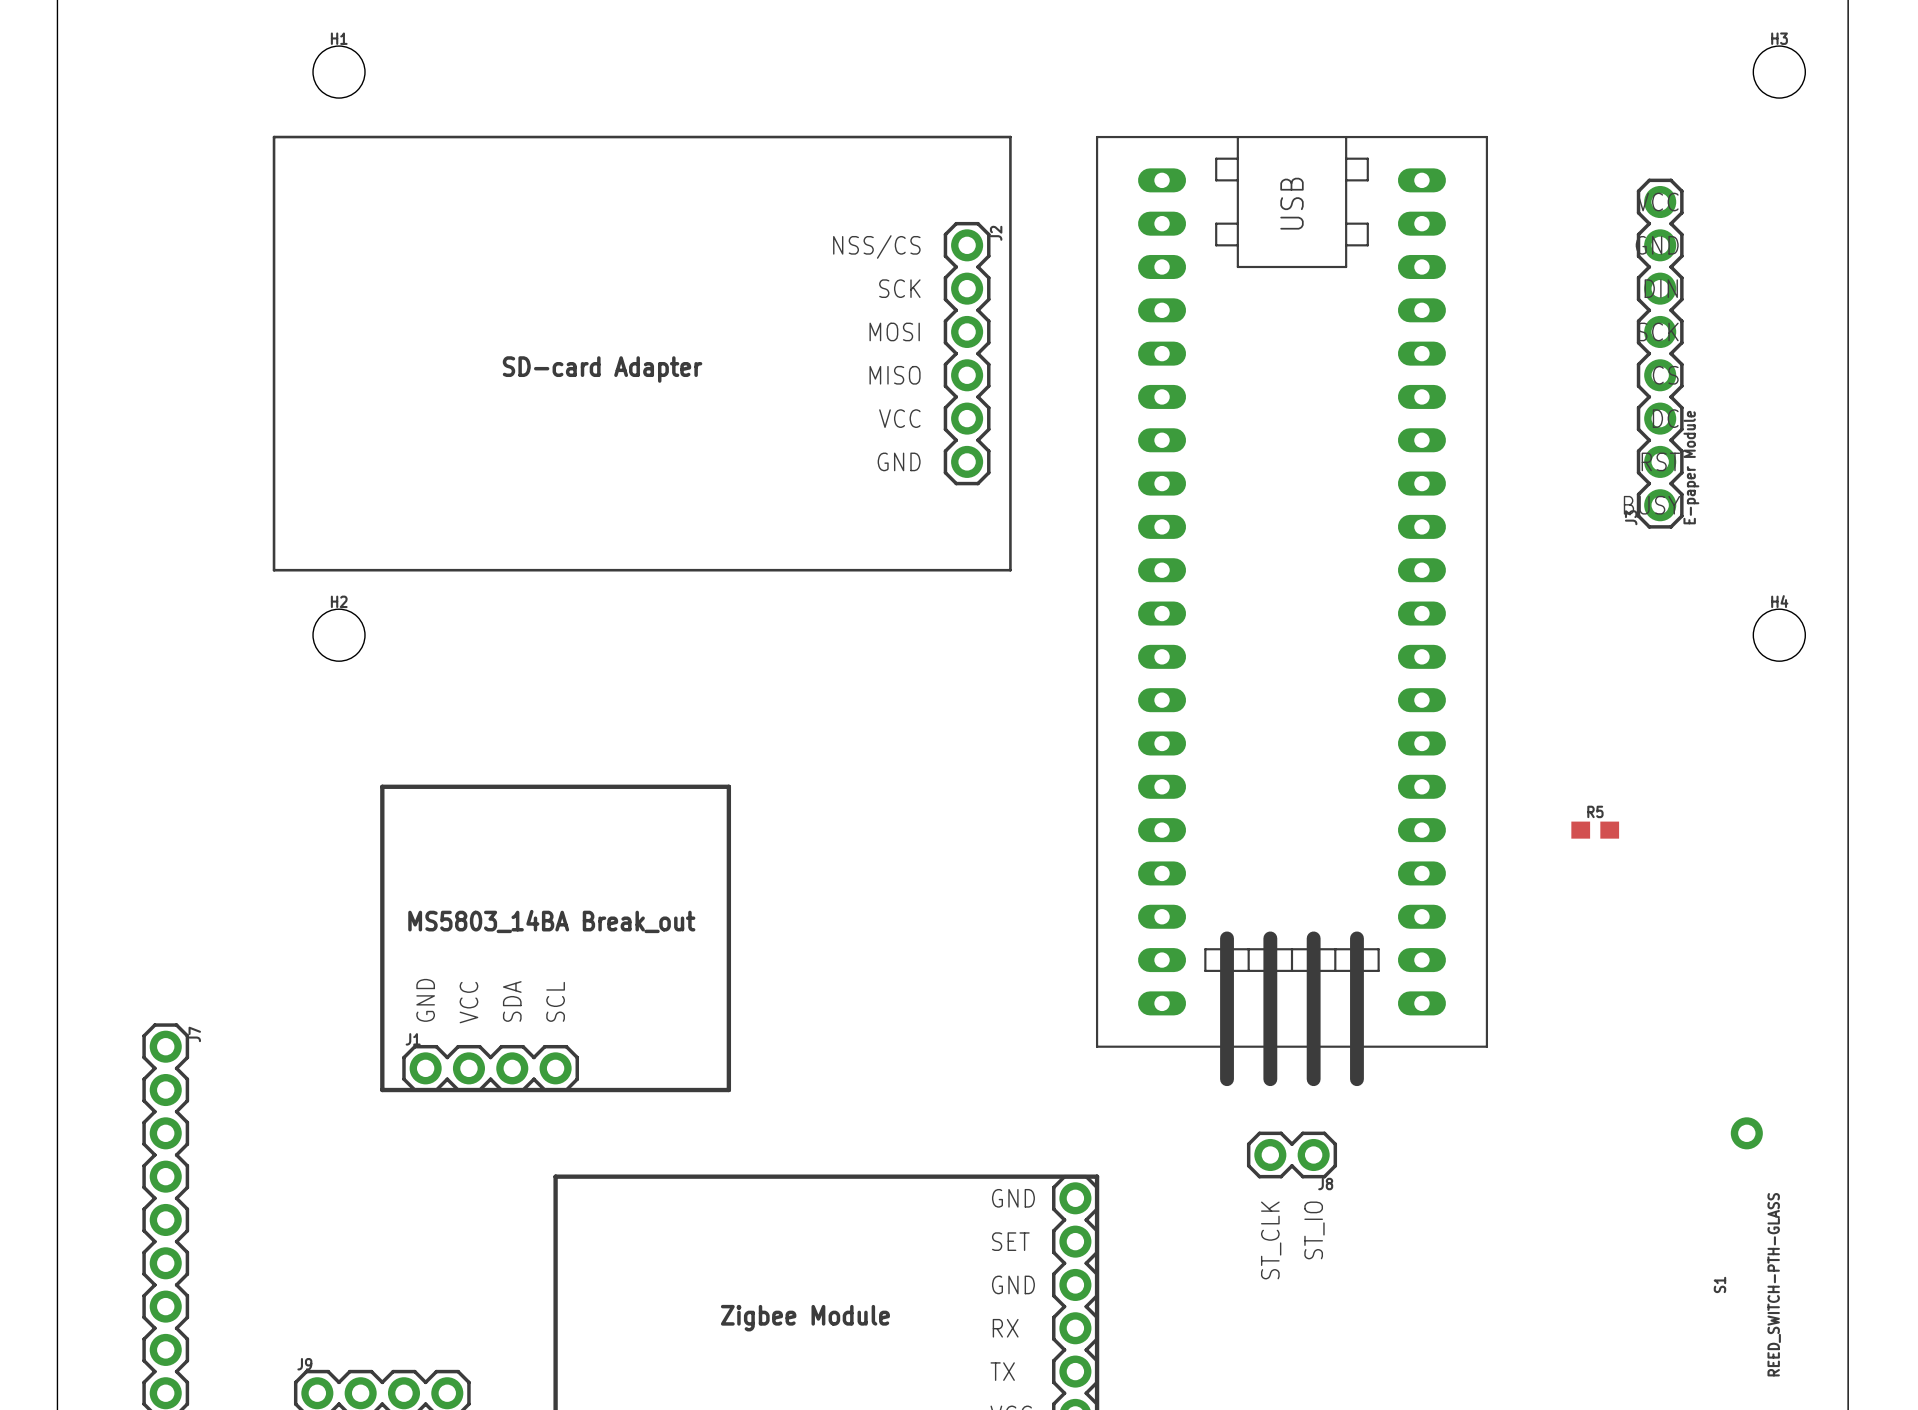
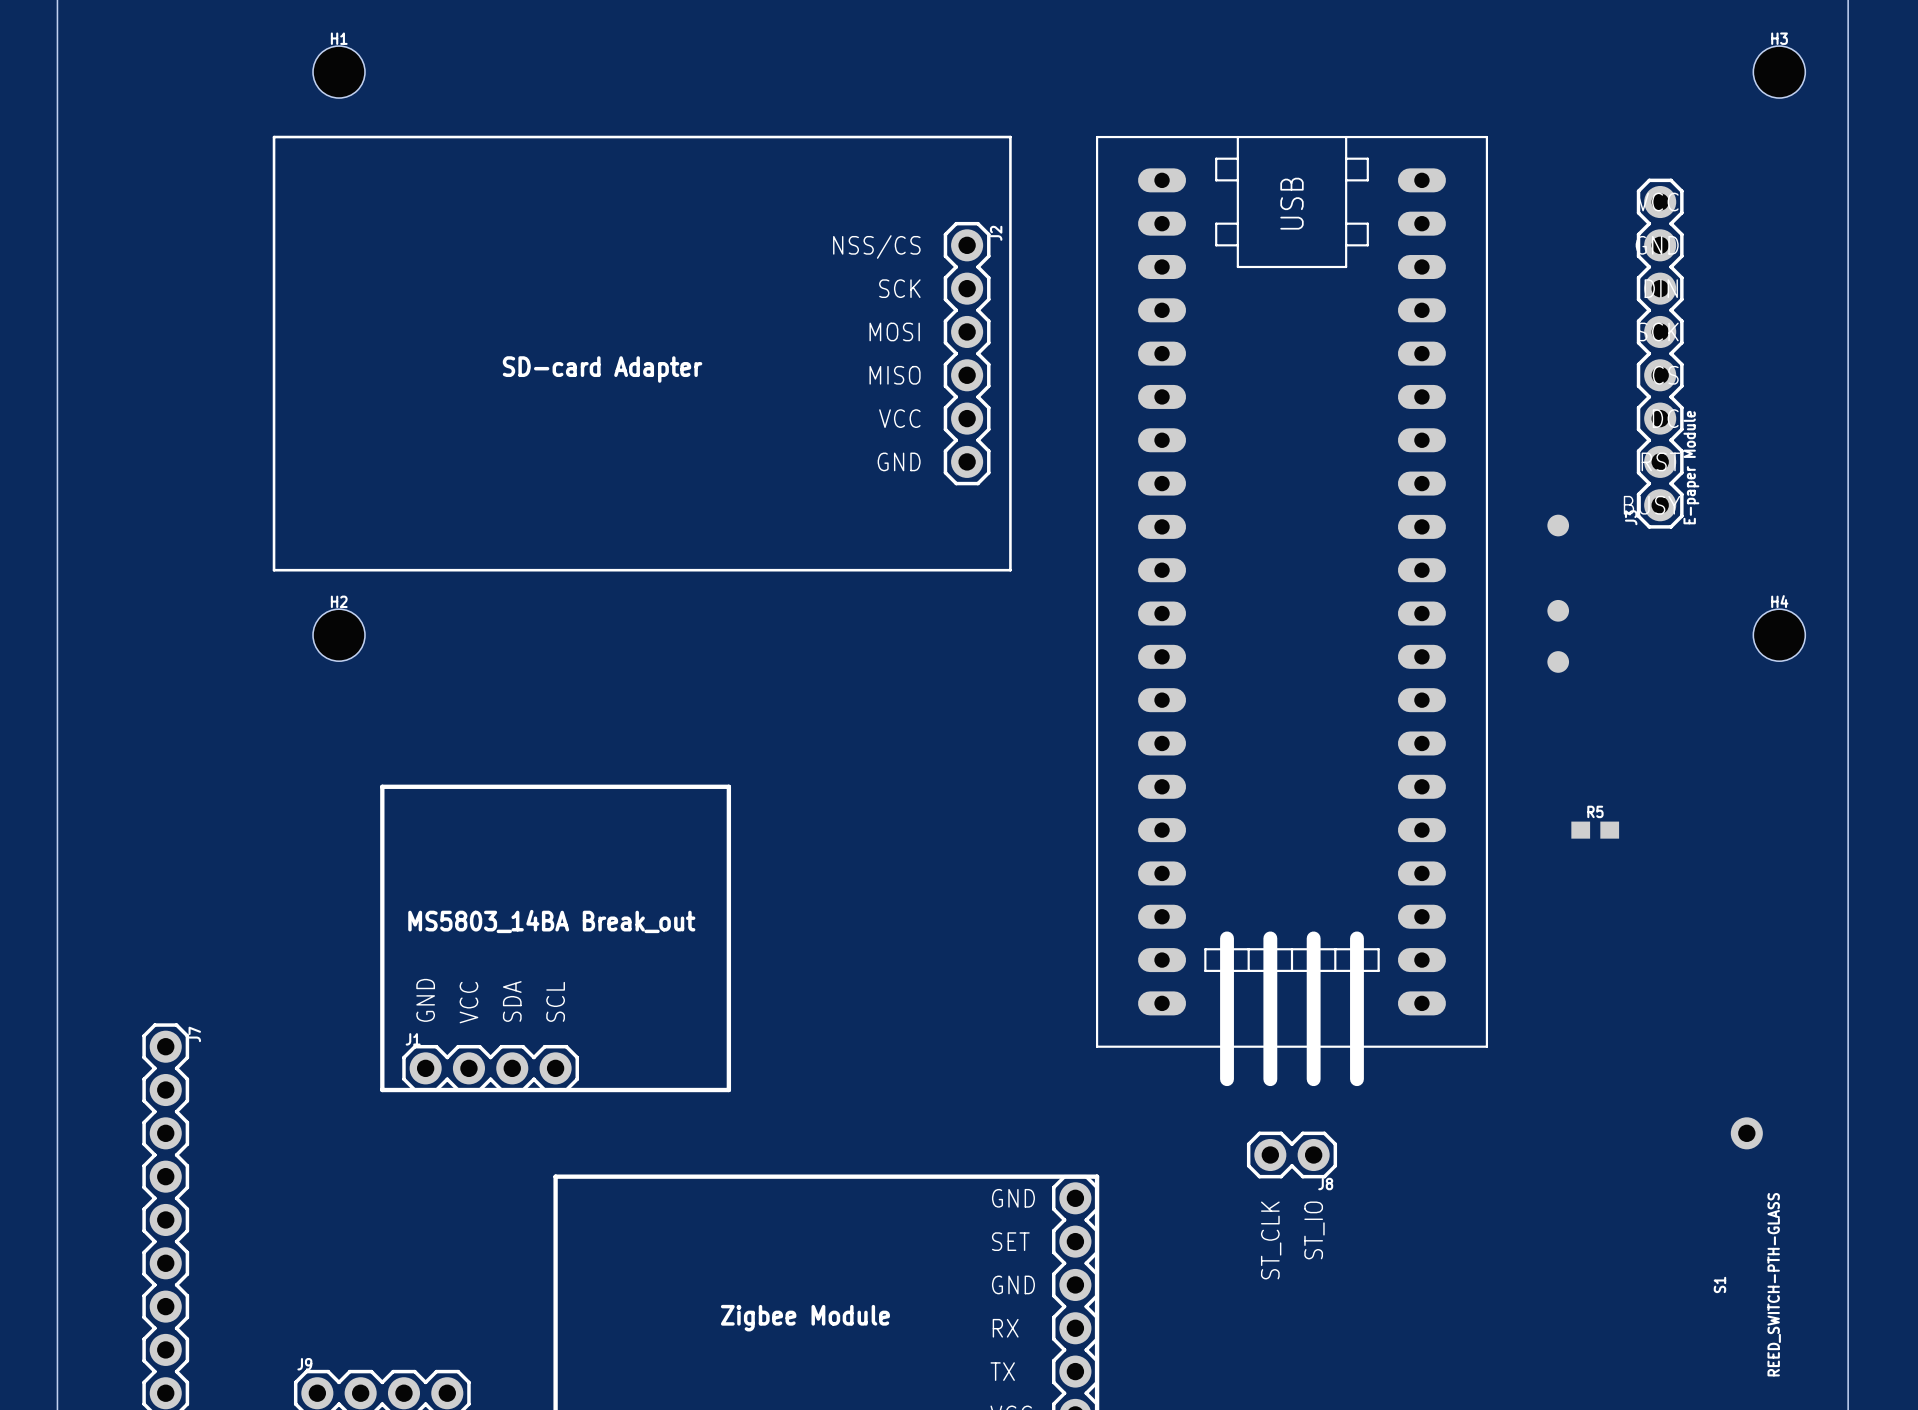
part: none -> (1558, 525)
part: none -> (1558, 610)
part: none -> (1558, 661)

